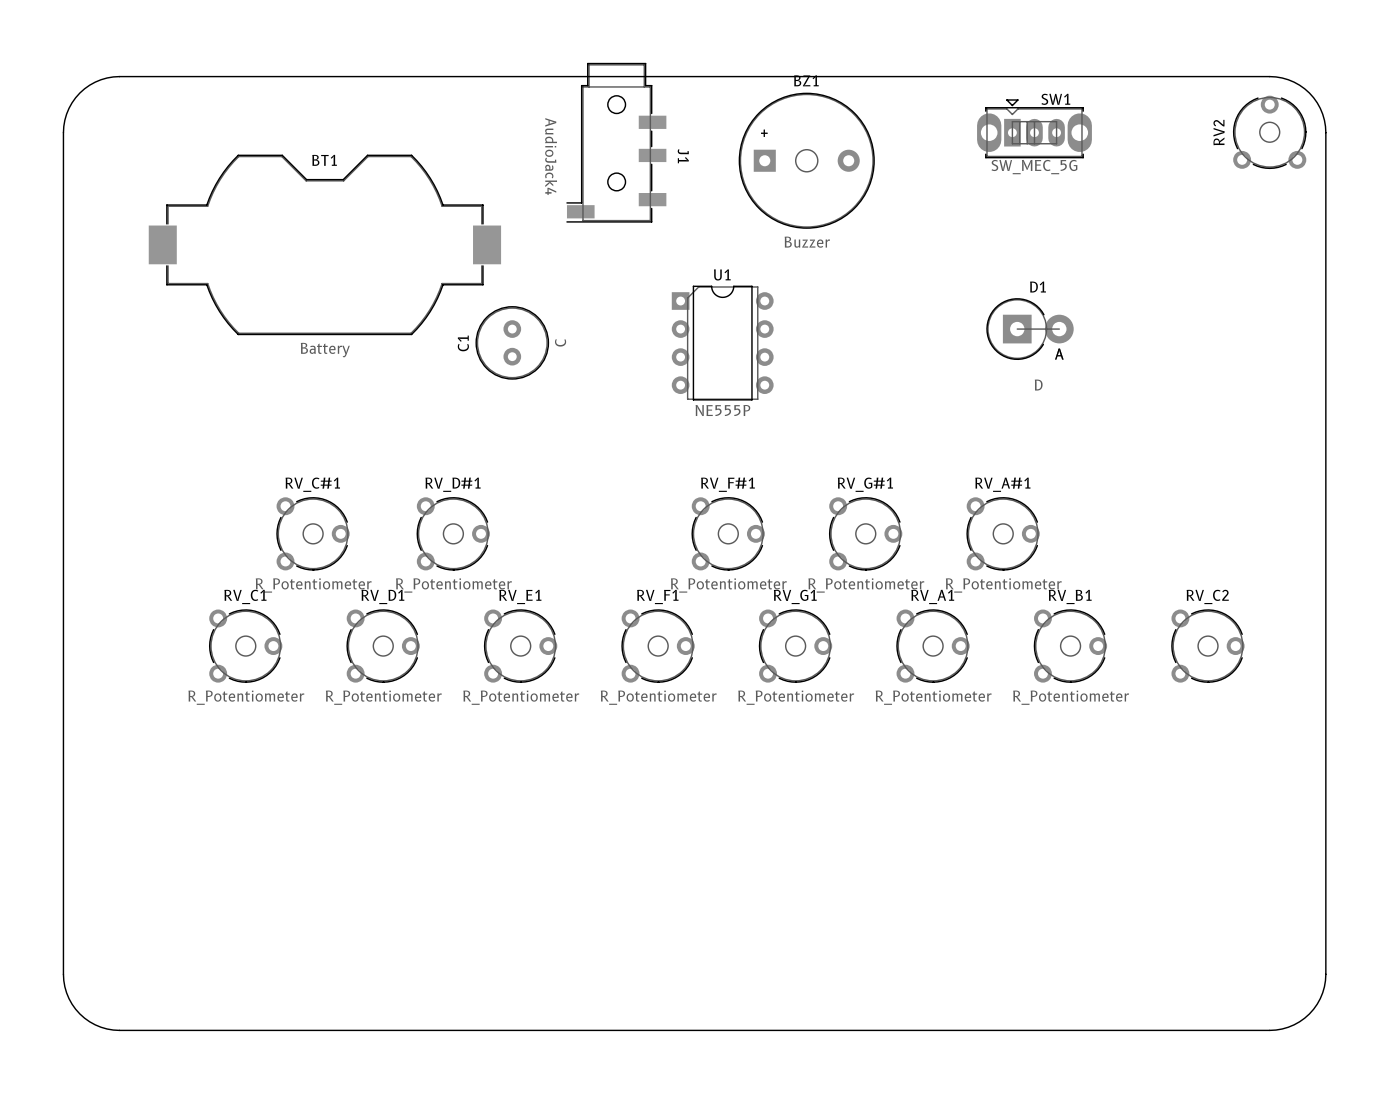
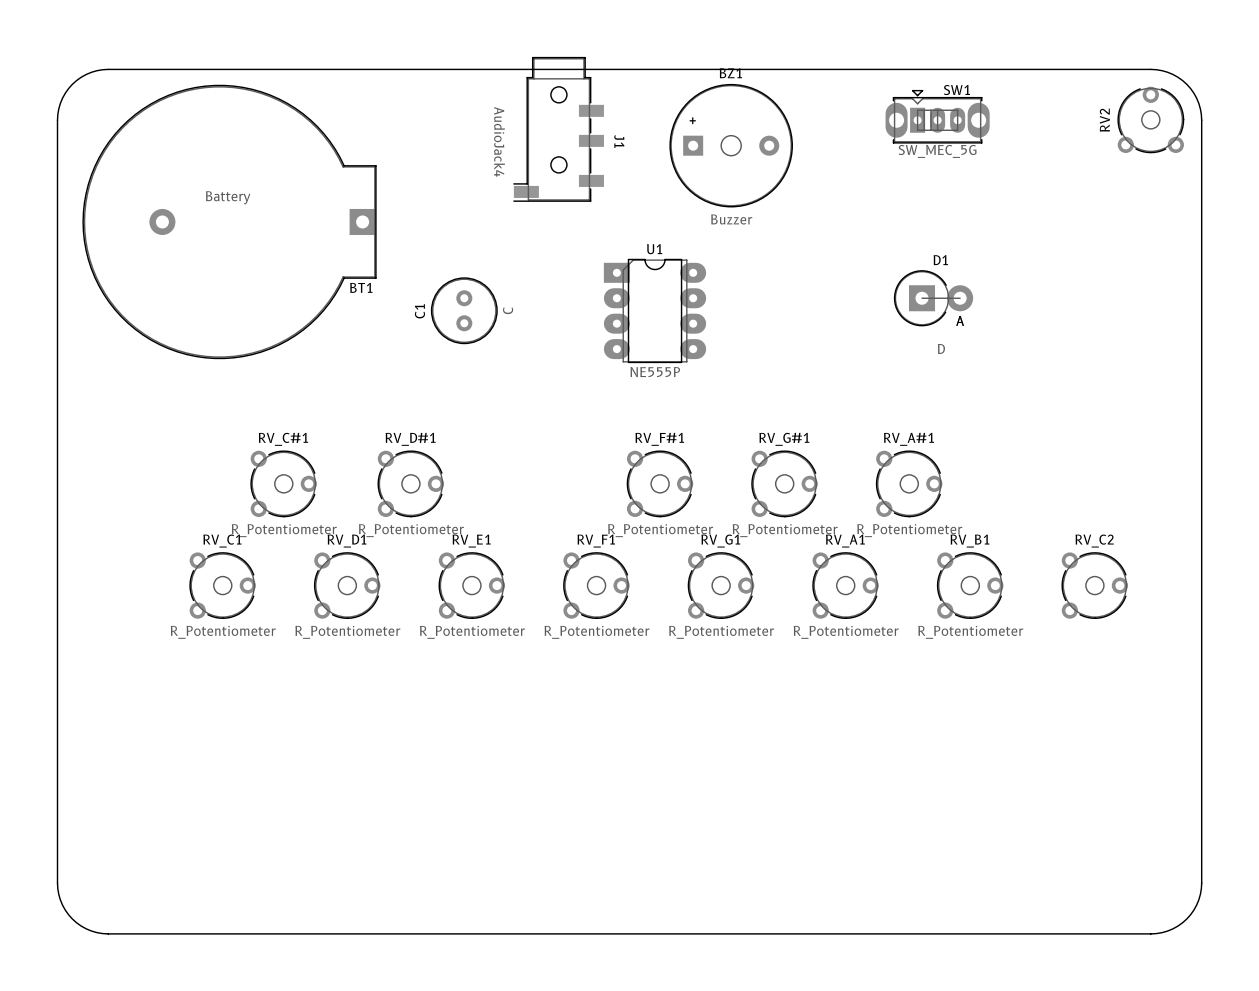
BT1 footprint: [148, 154, 502, 336] -> [82, 84, 377, 360]
BT1 name position: BT1 (324, 160) -> BT1 (361, 287)
U1 footprint: [671, 285, 774, 401] -> [603, 258, 707, 364]
BT1 value position: Battery (325, 350) -> Battery (228, 197)

